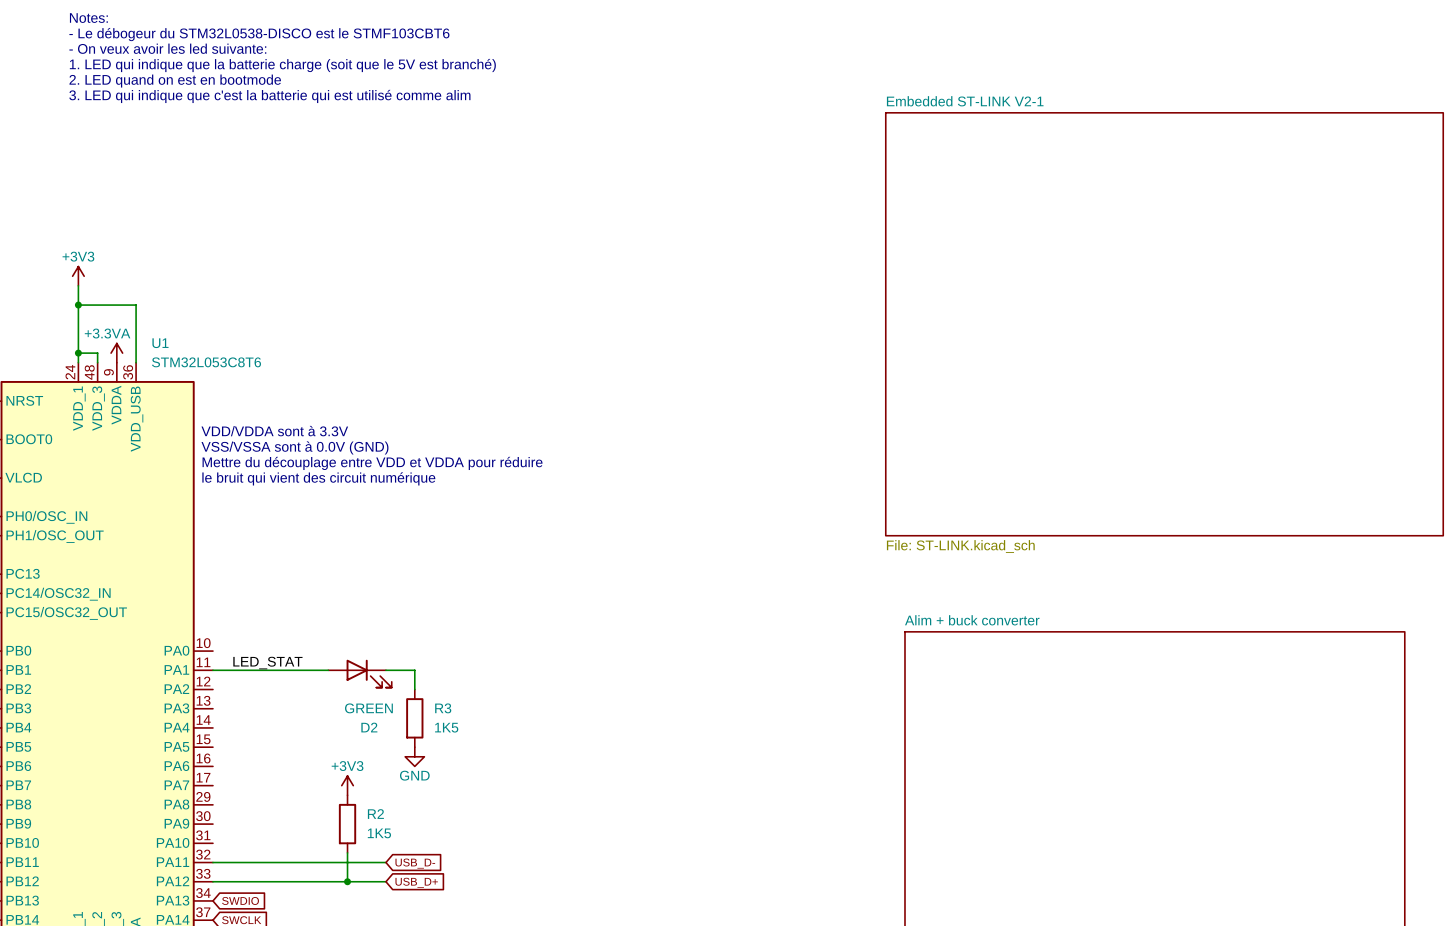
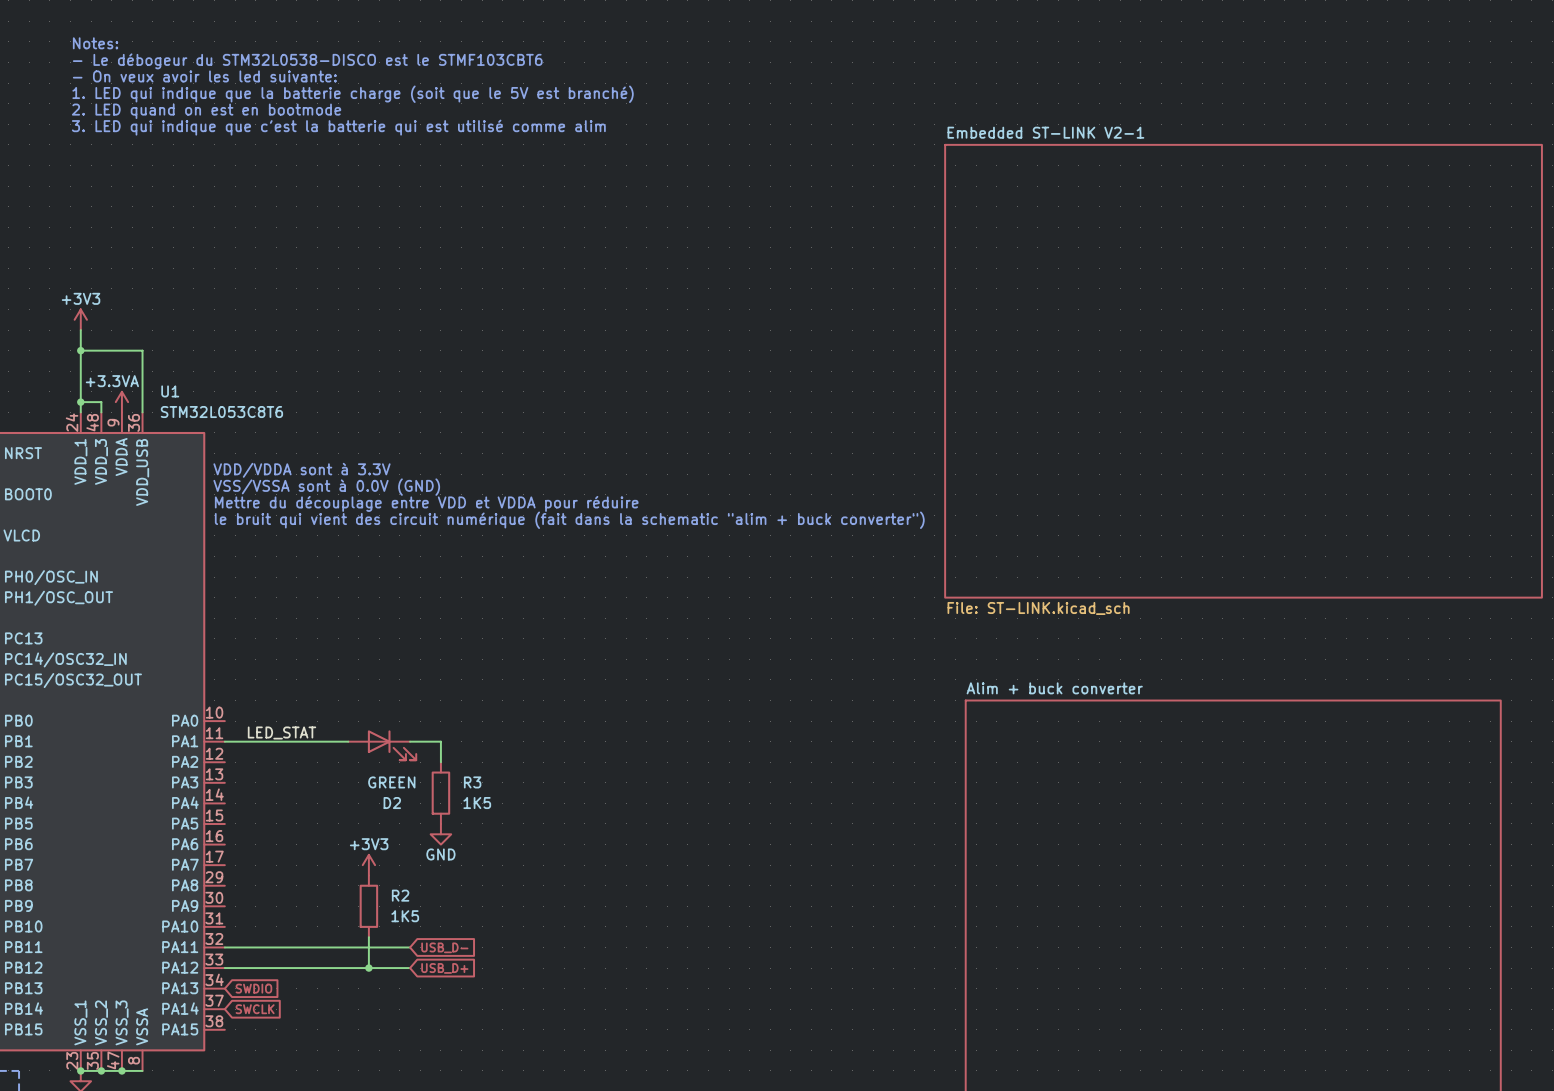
text: none -> VDD/VDDA sont à 3.3V (301, 470)
text: VDD/VDDA sont à 3.3V (274, 431) -> VSS/VSSA sont à 0.0V (GND) (326, 487)
text: VSS/VSSA sont à 0.0V (GND) (294, 447) -> Mettre du découplage entre VDD et VDDA pour réduire (426, 503)
text: Mettre du découplage entre VDD et VDDA pour réduire (372, 463) -> le bruit qui vient des circuit numérique (fait dans la schematic "alim + buck converter") (569, 520)
text: le bruit qui vient des circuit numérique (318, 478) -> none

